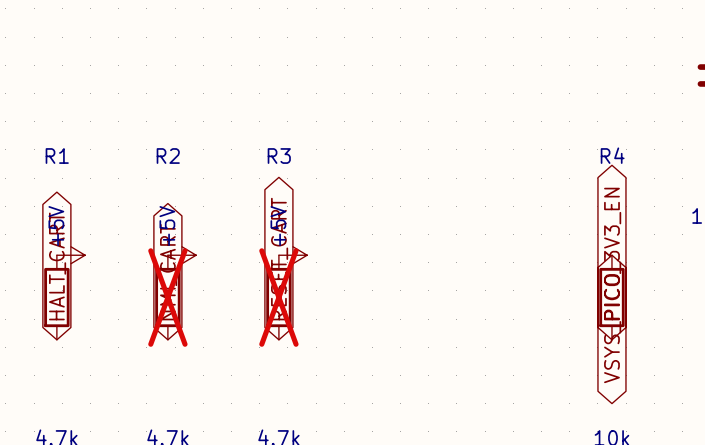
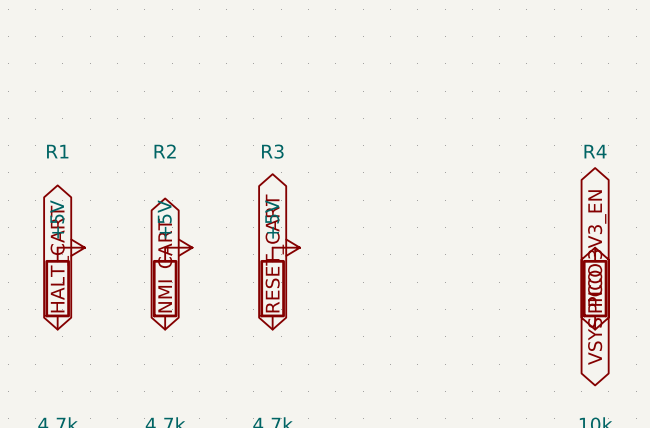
R2 do-not-place cross: (167, 297) -> none
R3 do-not-place cross: (278, 297) -> none

